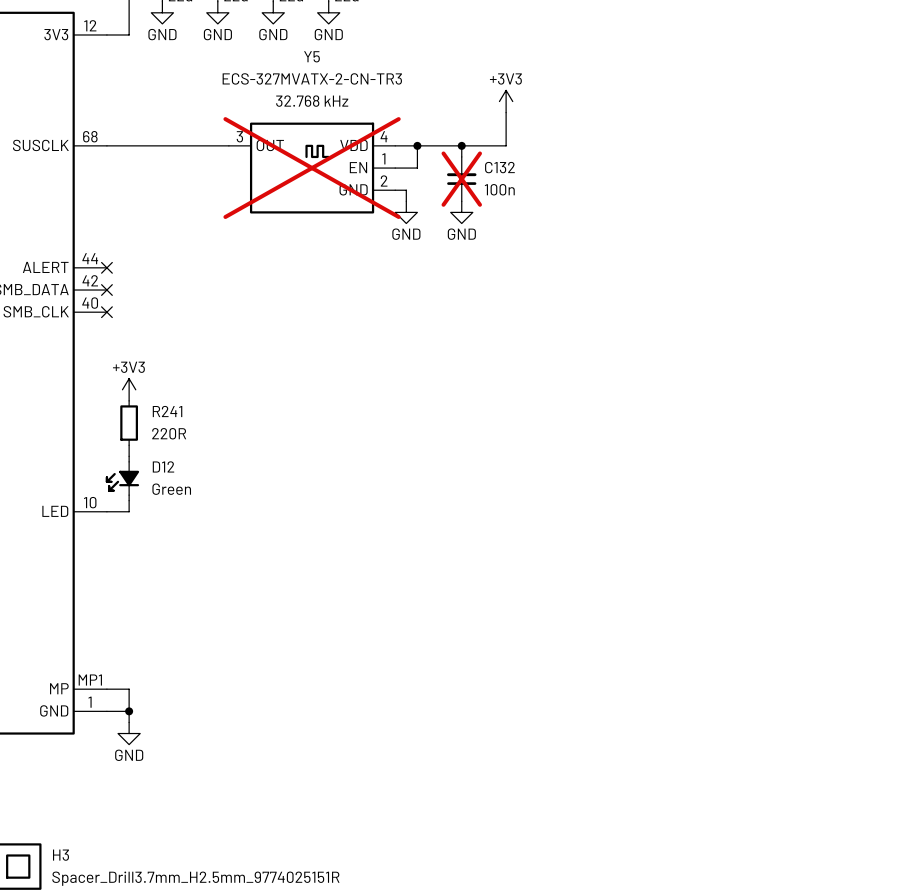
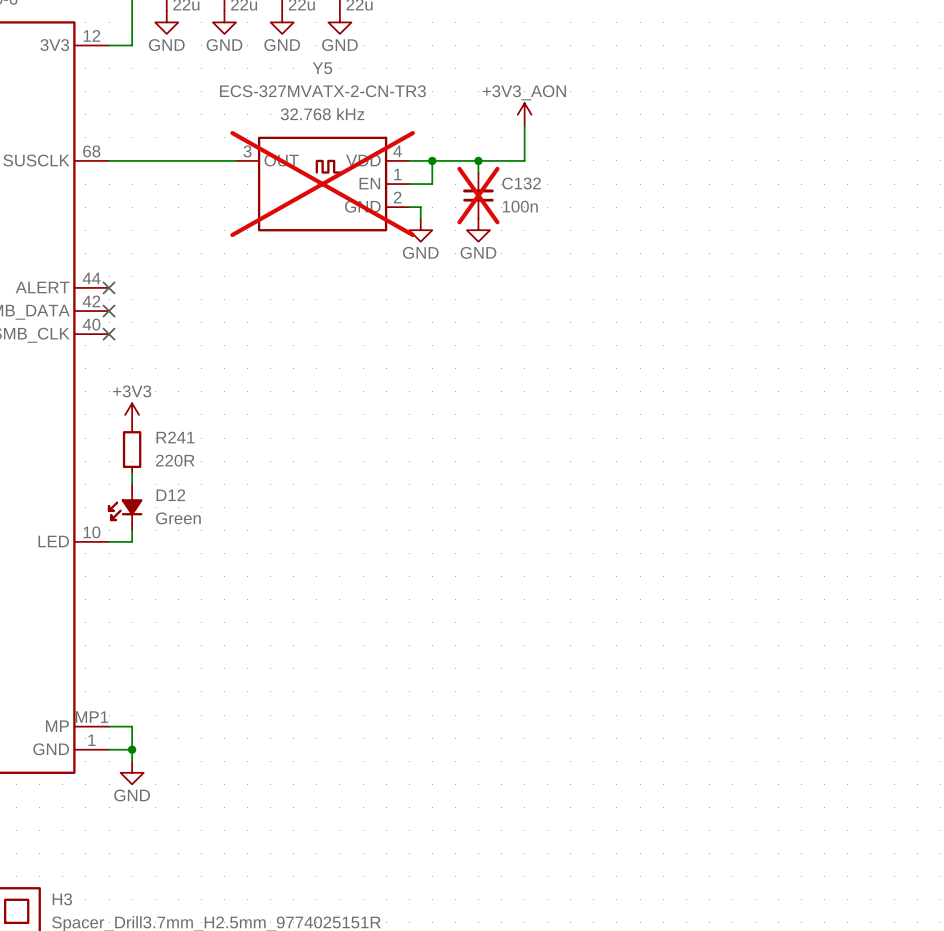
power symbol: +3V3 (506, 101) -> +3V3_AON (524, 114)

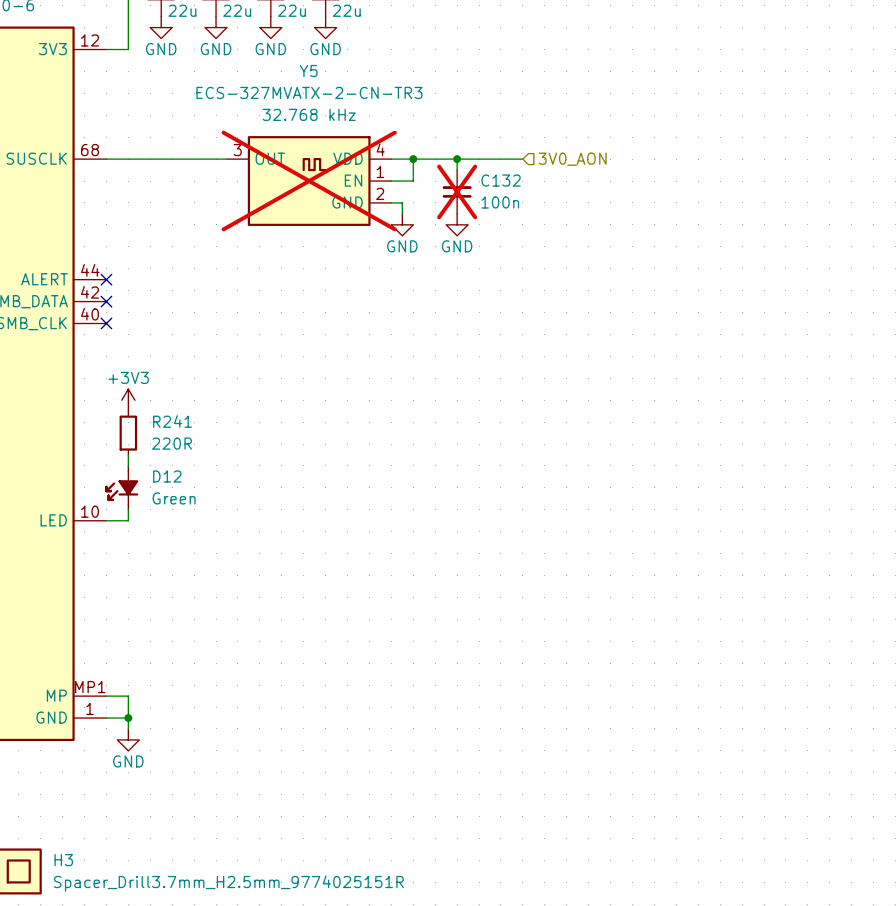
power symbol: +3V3_AON (524, 114) -> none
wire: (524, 126) (524, 160) -> (522, 159) (500, 159)
hierarchical label: none -> 3V0_AON (572, 159)

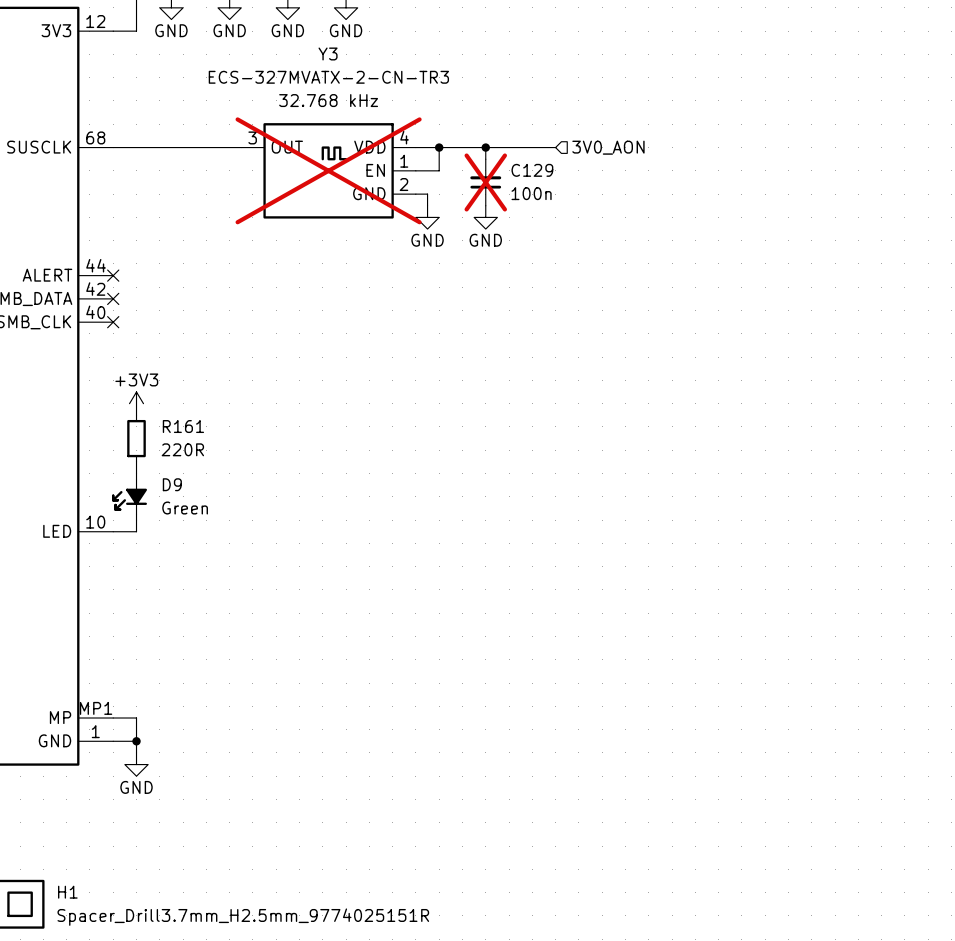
Y5 name: Y5 (308, 71) -> Y3 (328, 53)
C132 name: C132 (501, 180) -> C129 (532, 170)
R241 name: R241 (172, 421) -> R161 (183, 426)
D12 name: D12 (167, 476) -> D9 (172, 484)
H3 name: H3 (63, 860) -> H1 (67, 892)

